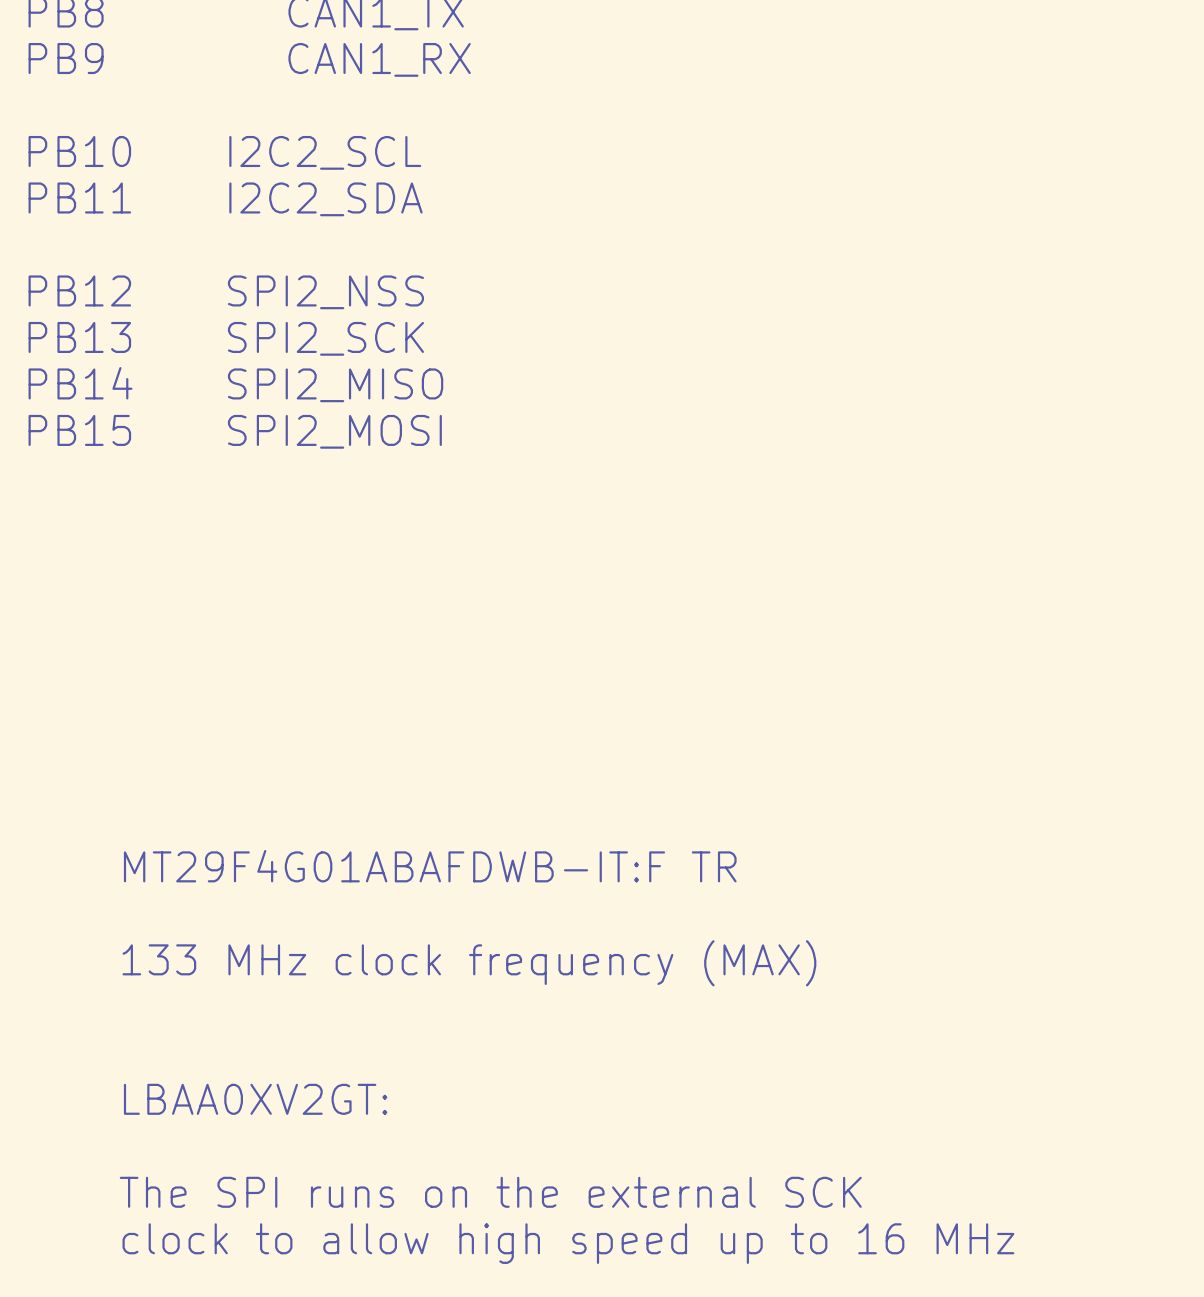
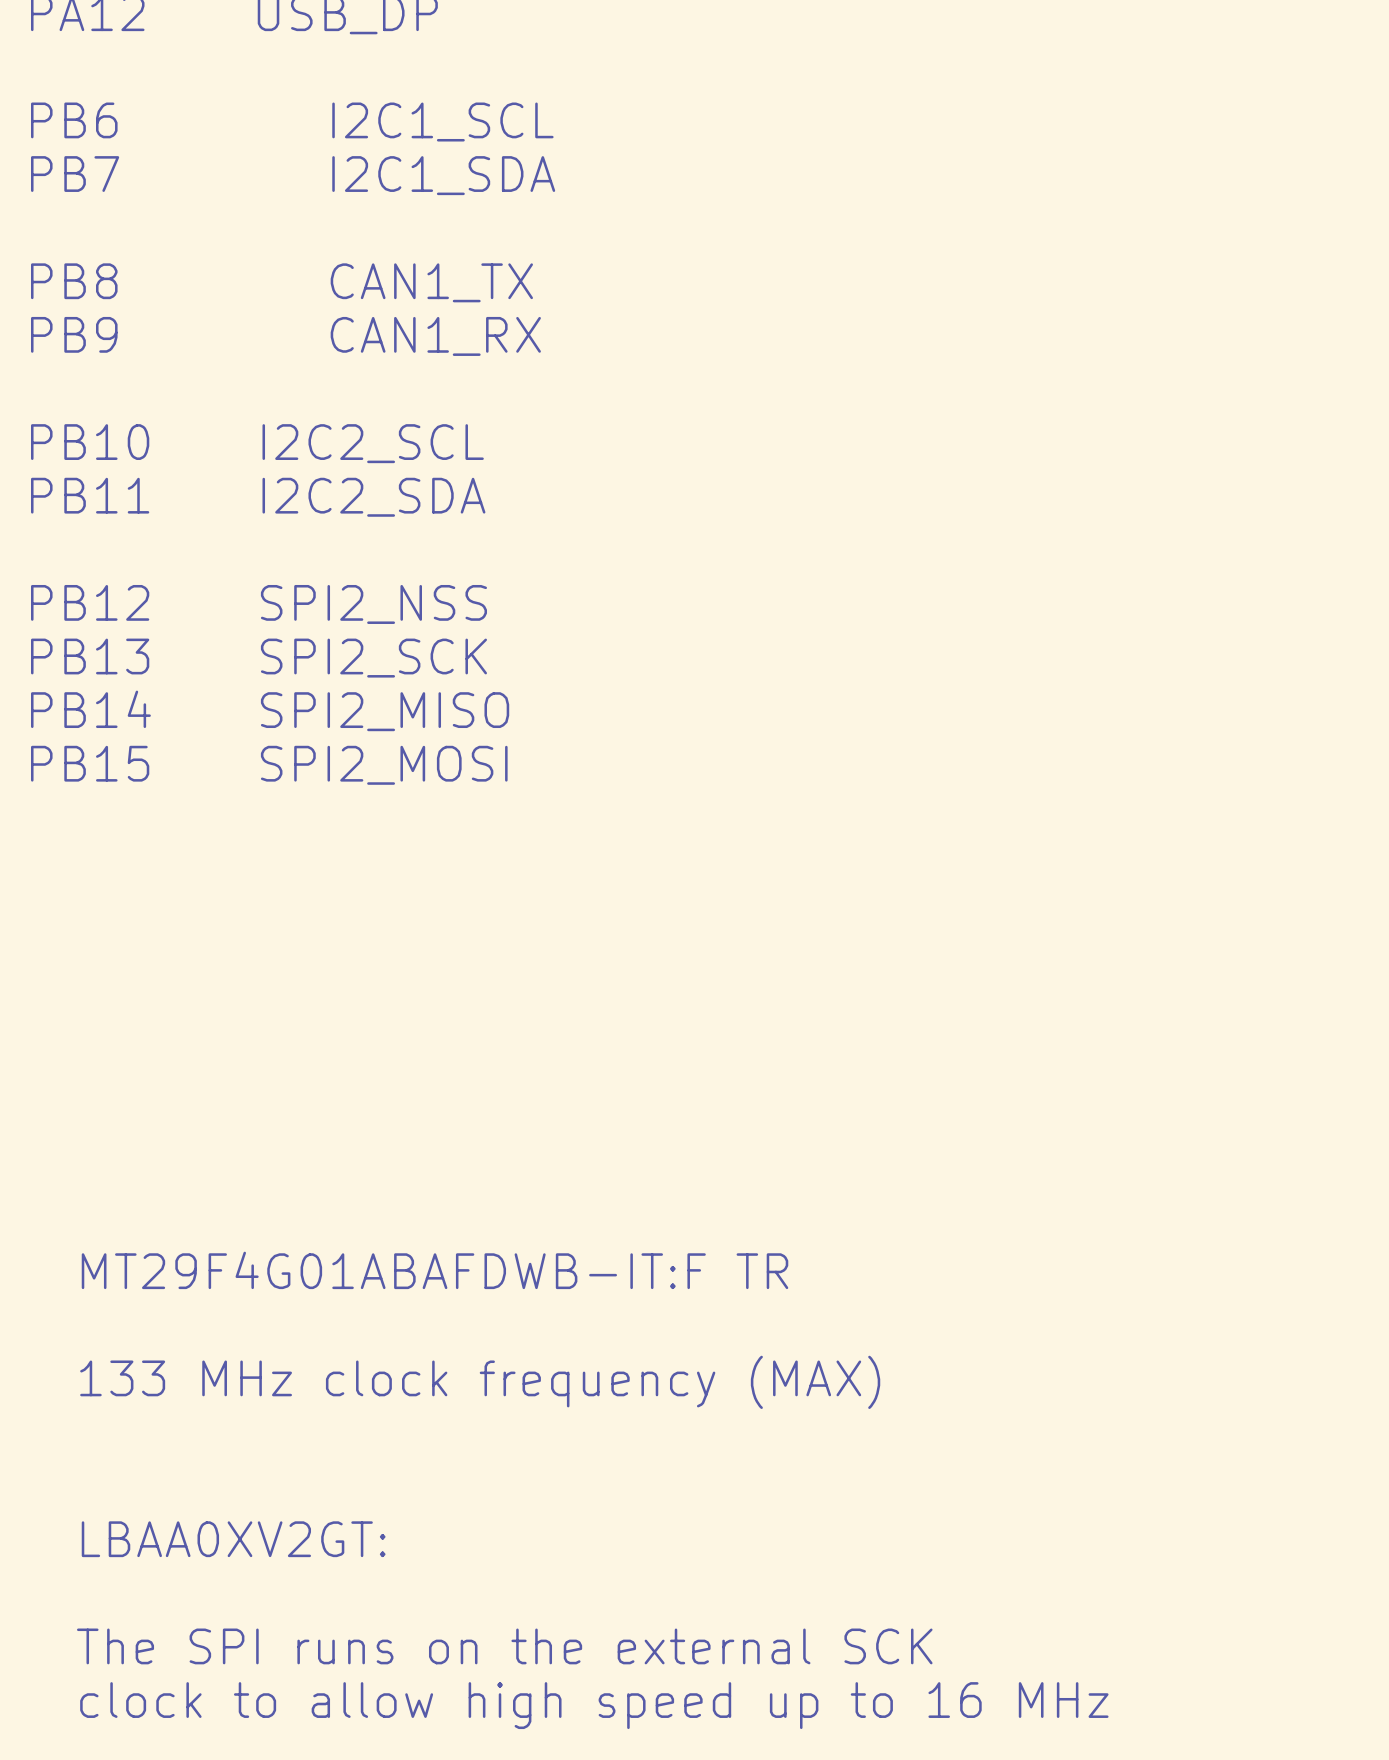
text position: MT29F4G01ABAFDWB-IT:F TR (430, 866) -> MT29F4G01ABAFDWB-IT:F TR (435, 1270)
text position: 133 MHz clock frequency (MAX) (469, 963) -> 133 MHz clock frequency (MAX) (480, 1382)
text position: LBAA0XV2GT: (255, 1099) -> LBAA0XV2GT: (233, 1539)
text position: The SPI runs on the external SCK (490, 1192) -> The SPI runs on the external SCK (504, 1646)
text position: clock to allow high speed up to 16 MHz (568, 1243) -> clock to allow high speed up to 16 MHz (594, 1705)

